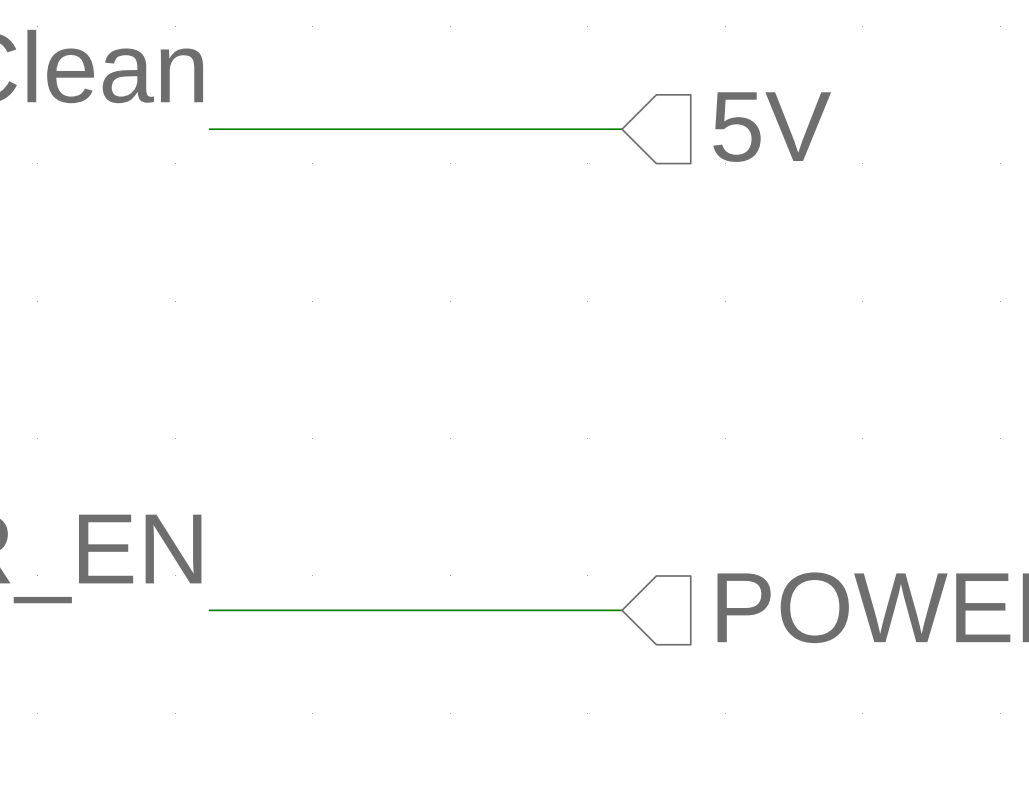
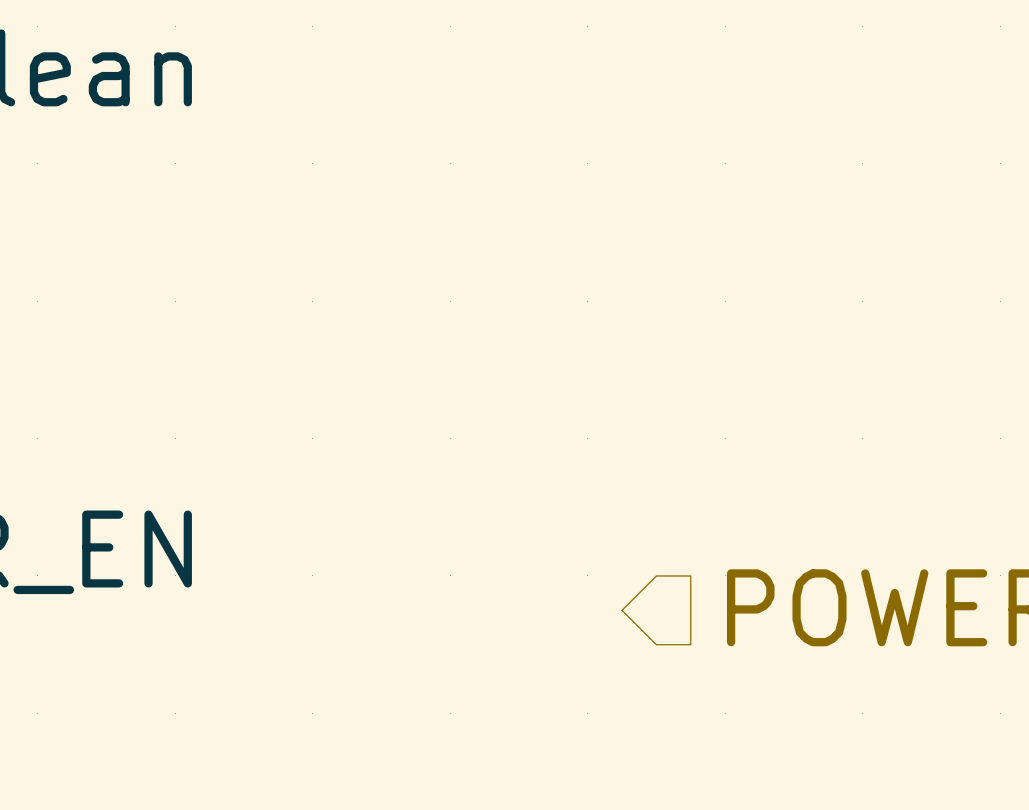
hierarchical label: 5V (772, 127) -> none
wire: (209, 129) (622, 129) -> none
wire: (209, 610) (622, 610) -> none

